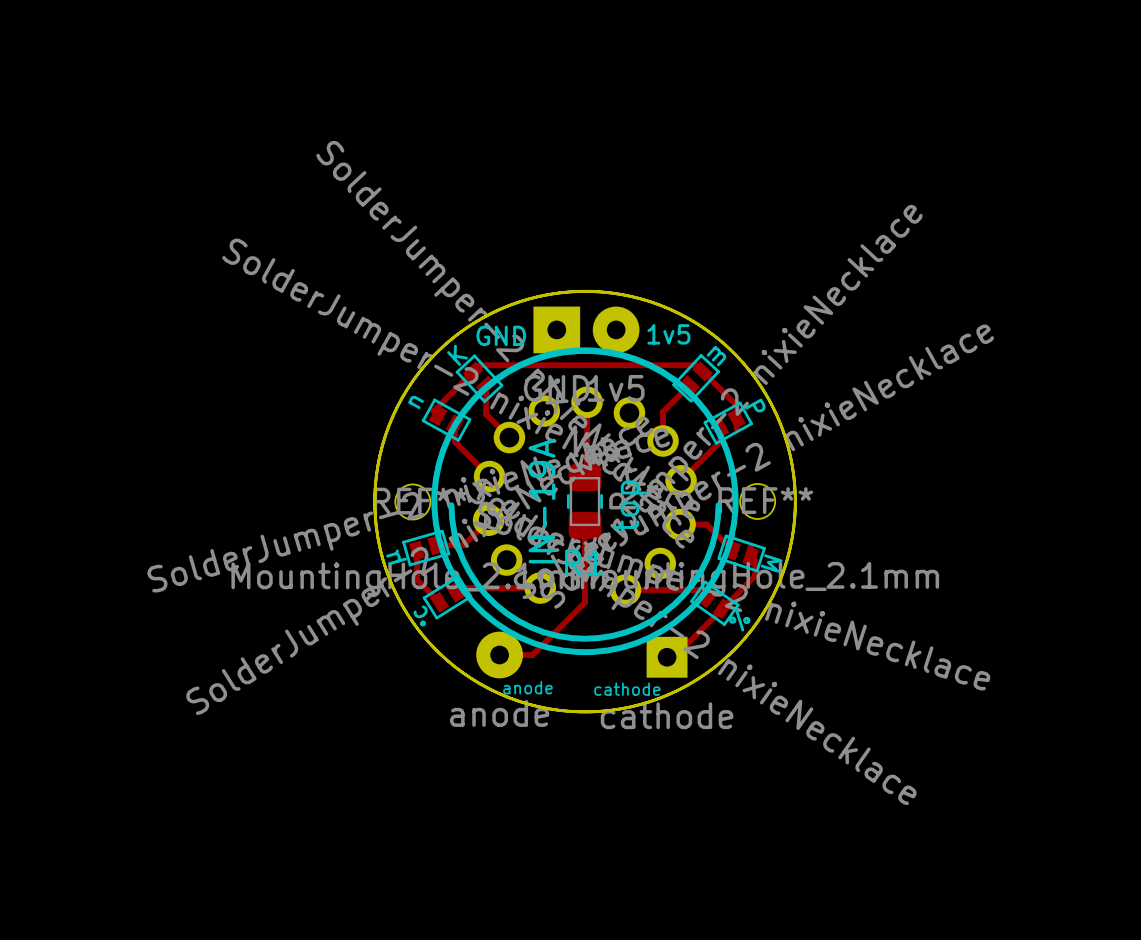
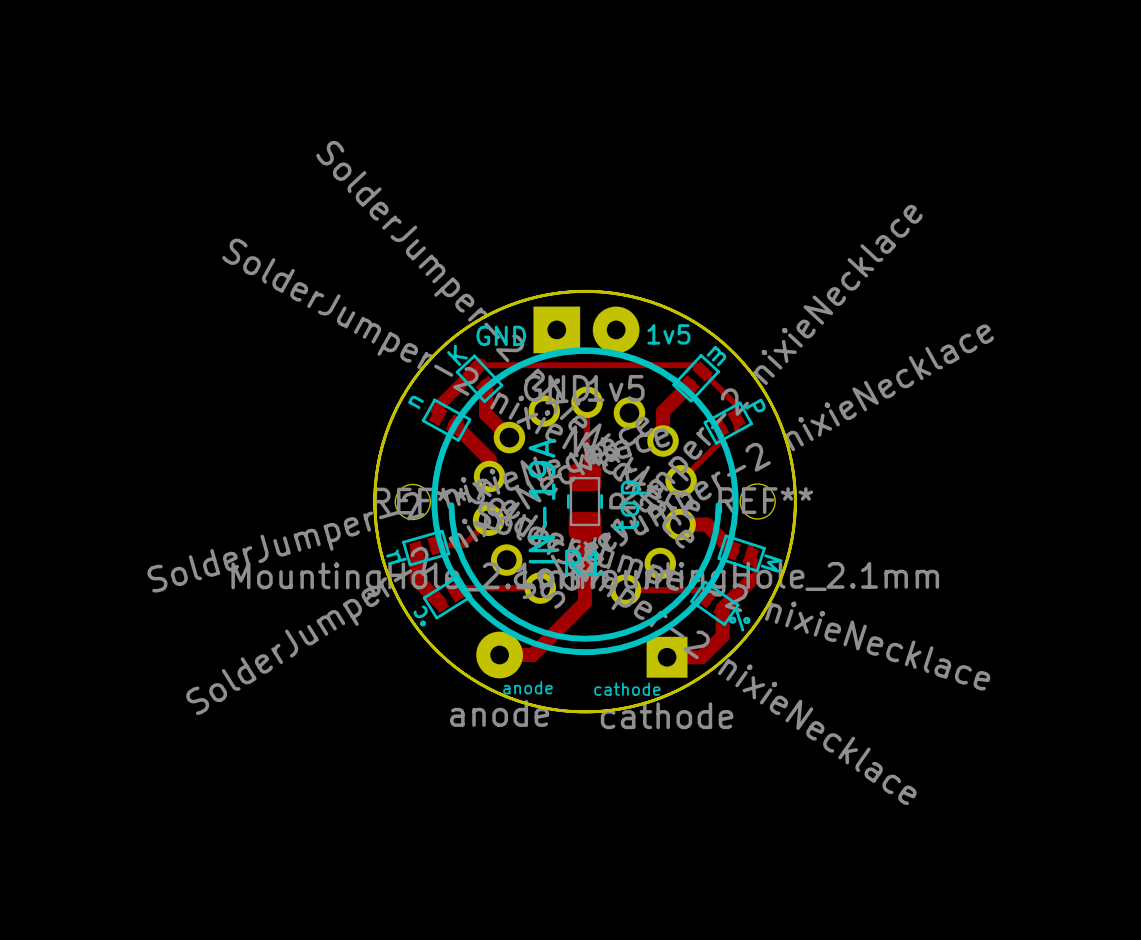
track width: thin (479, 365) (438, 406) -> thick (479, 365) (438, 406)
track width: thin (486, 385) (486, 414) (509, 437) -> thick (486, 385) (486, 414) (509, 437)
track width: thin (689, 385) (663, 411) (663, 441) -> thick (689, 385) (663, 411) (663, 441)
track: (454, 424) (454, 441) (489, 476) -> (454, 424) (489, 459) (489, 476)
track width: thin (680, 524) (706, 524) (732, 550) -> thick (680, 524) (706, 524) (732, 550)
track width: thin (584, 525) (584, 602) (532, 655) (499, 655) -> thick (584, 525) (584, 602) (532, 655) (499, 655)
track width: thin (417, 550) (417, 579) (439, 602) -> thick (417, 550) (417, 579) (439, 602)
track width: thin (750, 580) (722, 608) -> thick (750, 580) (722, 608)
track: (722, 608) (673, 657) -> (722, 608) (722, 636) (701, 657) (673, 657)

